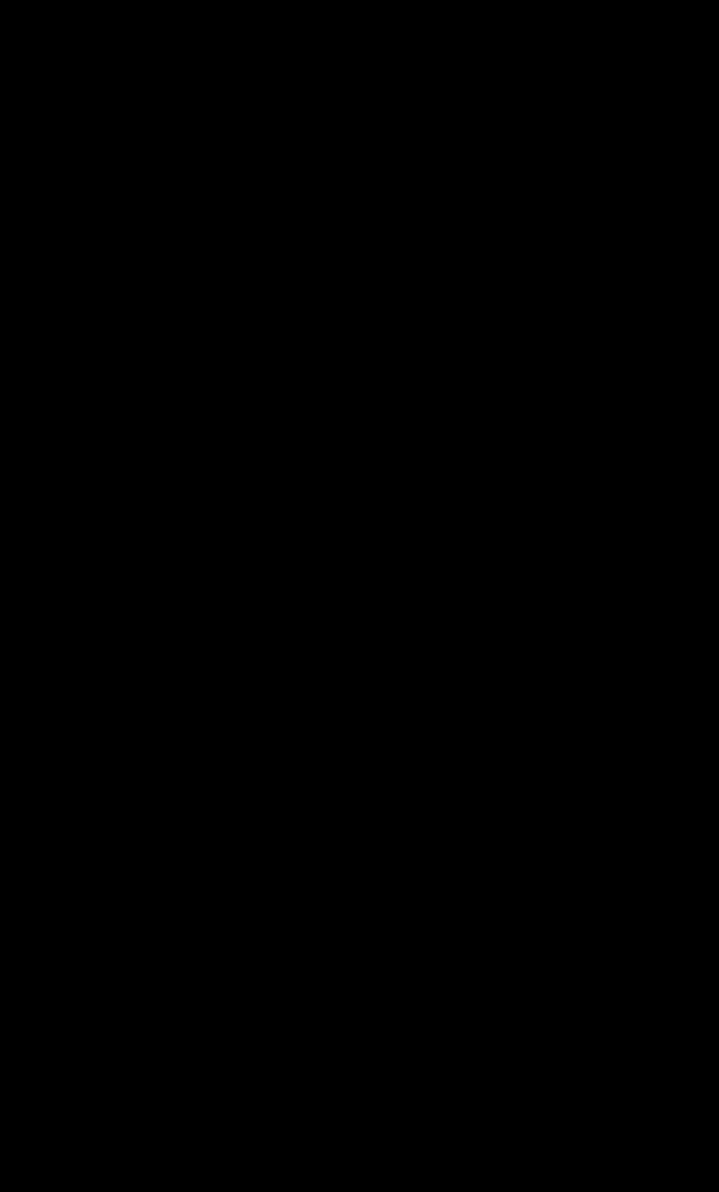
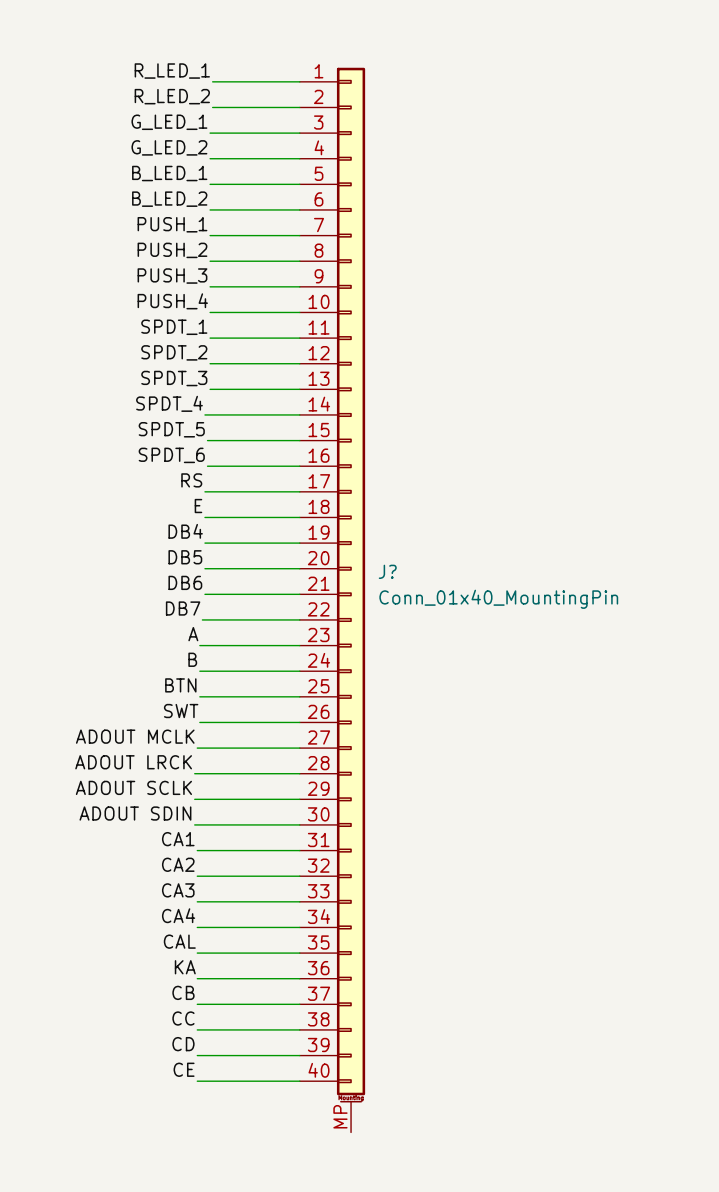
label: none -> R_LED_1 (172, 71)
wire: none -> (212, 81) (299, 81)
label: none -> R_LED_2 (172, 96)
wire: none -> (212, 107) (299, 107)
label: none -> G_LED_1 (169, 122)
wire: none -> (210, 133) (299, 133)
label: none -> G_LED_2 (169, 147)
wire: none -> (210, 158) (299, 158)
label: none -> B_LED_1 (169, 173)
wire: none -> (210, 184) (299, 184)
label: none -> B_LED_2 (169, 199)
wire: none -> (210, 209) (299, 209)
label: none -> PUSH_1 (172, 224)
wire: none -> (210, 235) (299, 235)
label: none -> PUSH_2 (172, 250)
wire: none -> (210, 261) (299, 261)
label: none -> PUSH_3 (172, 276)
wire: none -> (210, 286) (299, 286)
label: none -> PUSH_4 (172, 301)
wire: none -> (210, 312) (299, 312)
label: none -> SPDT_1 (174, 327)
wire: none -> (210, 338) (299, 338)
label: none -> SPDT_2 (174, 352)
wire: none -> (210, 363) (299, 363)
label: none -> SPDT_3 (174, 378)
wire: none -> (210, 389) (299, 389)
label: none -> SPDT_4 (169, 403)
wire: none -> (204, 414) (299, 414)
label: none -> SPDT_5 (171, 429)
wire: none -> (207, 440) (299, 440)
label: none -> SPDT_6 (171, 455)
wire: none -> (207, 466) (299, 466)
label: none -> RS (191, 480)
wire: none -> (204, 491) (299, 491)
label: none -> E (198, 506)
wire: none -> (204, 517) (299, 517)
label: none -> DB4 (185, 531)
wire: none -> (204, 543) (299, 543)
label: none -> DB5 (185, 557)
wire: none -> (204, 568) (299, 568)
label: none -> DB6 (185, 582)
wire: none -> (204, 594) (299, 594)
J?: none -> Conn_01x40_MountingPin (332, 600)
label: none -> DB7 (183, 608)
wire: none -> (202, 619) (299, 619)
label: none -> A (193, 634)
wire: none -> (199, 645) (299, 645)
label: none -> B (192, 659)
wire: none -> (199, 671) (299, 671)
label: none -> BTN (180, 685)
wire: none -> (199, 696) (299, 696)
label: none -> SWT (181, 711)
wire: none -> (199, 722) (299, 722)
label: none -> ADOUT MCLK (135, 736)
wire: none -> (197, 748) (299, 748)
label: none -> ADOUT LRCK (133, 762)
wire: none -> (194, 773) (299, 773)
label: none -> ADOUT SCLK (133, 787)
wire: none -> (194, 799) (299, 799)
label: none -> ADOUT SDIN (135, 813)
wire: none -> (194, 824) (299, 824)
label: none -> CA1 (178, 839)
wire: none -> (197, 850) (299, 850)
label: none -> CA2 (178, 864)
wire: none -> (197, 876) (299, 876)
label: none -> CA3 (178, 890)
wire: none -> (197, 901) (299, 901)
label: none -> CA4 (178, 915)
wire: none -> (197, 927) (299, 927)
label: none -> CAL (179, 941)
wire: none -> (197, 953) (299, 953)
label: none -> KA (185, 967)
wire: none -> (197, 978) (299, 978)
label: none -> CB (183, 992)
wire: none -> (197, 1004) (299, 1004)
label: none -> CC (183, 1018)
wire: none -> (197, 1029) (299, 1029)
label: none -> CD (183, 1044)
wire: none -> (197, 1055) (299, 1055)
label: none -> CE (184, 1069)
wire: none -> (197, 1081) (299, 1081)

